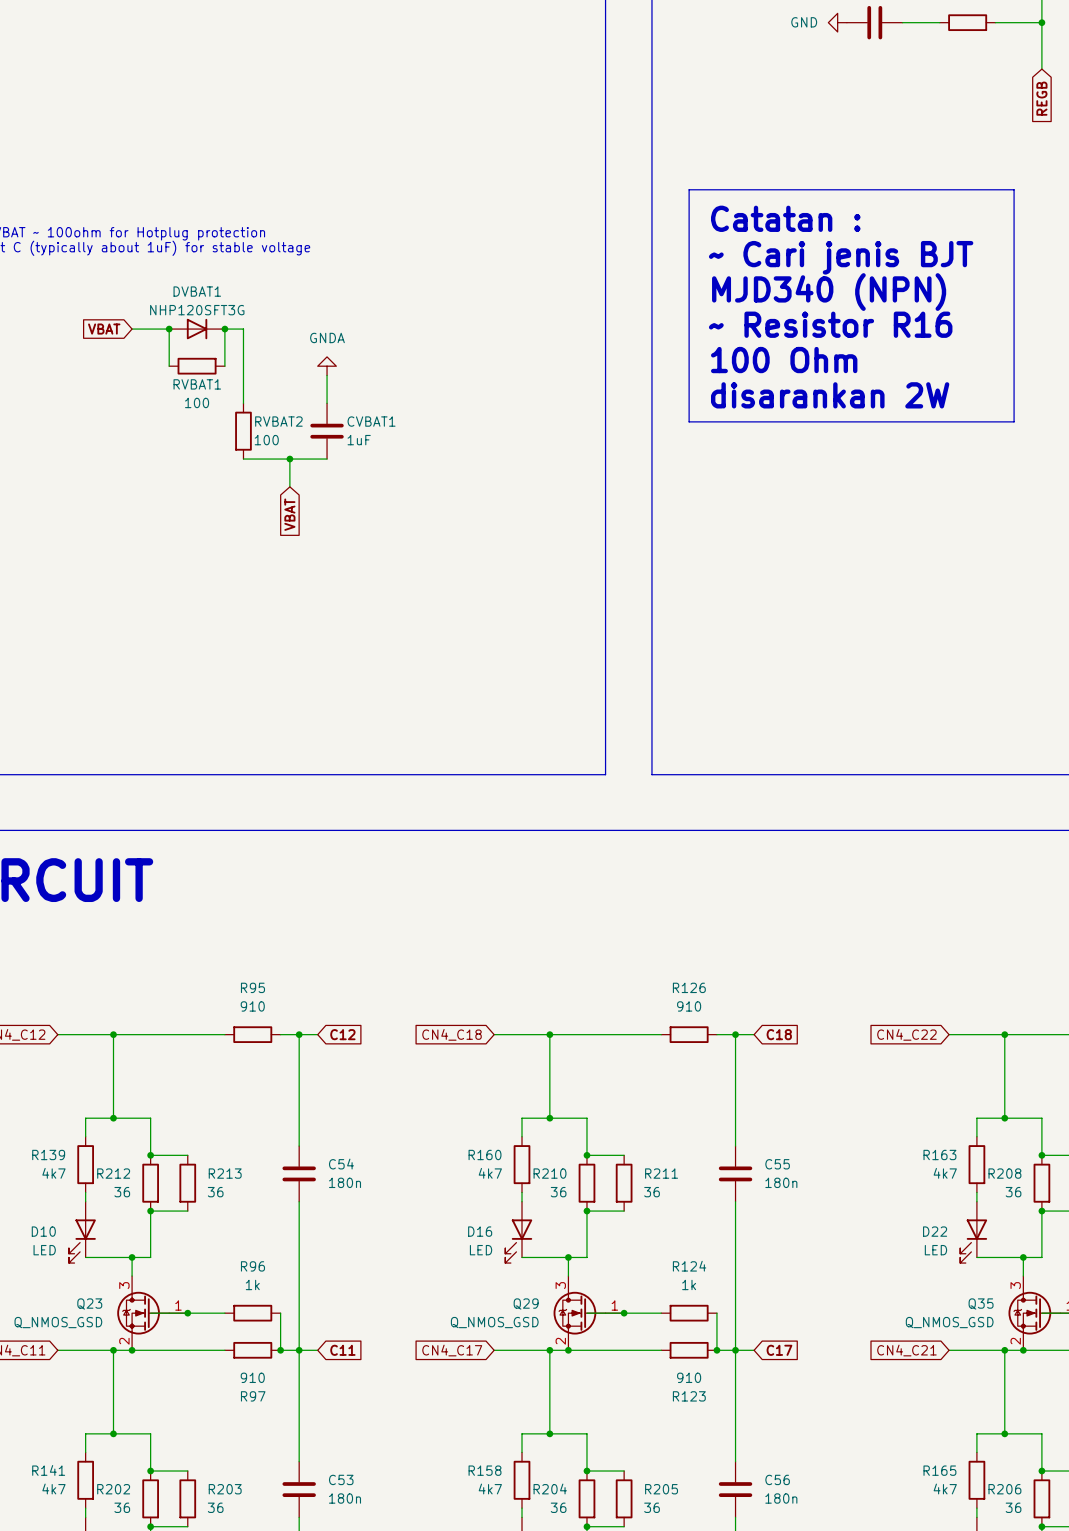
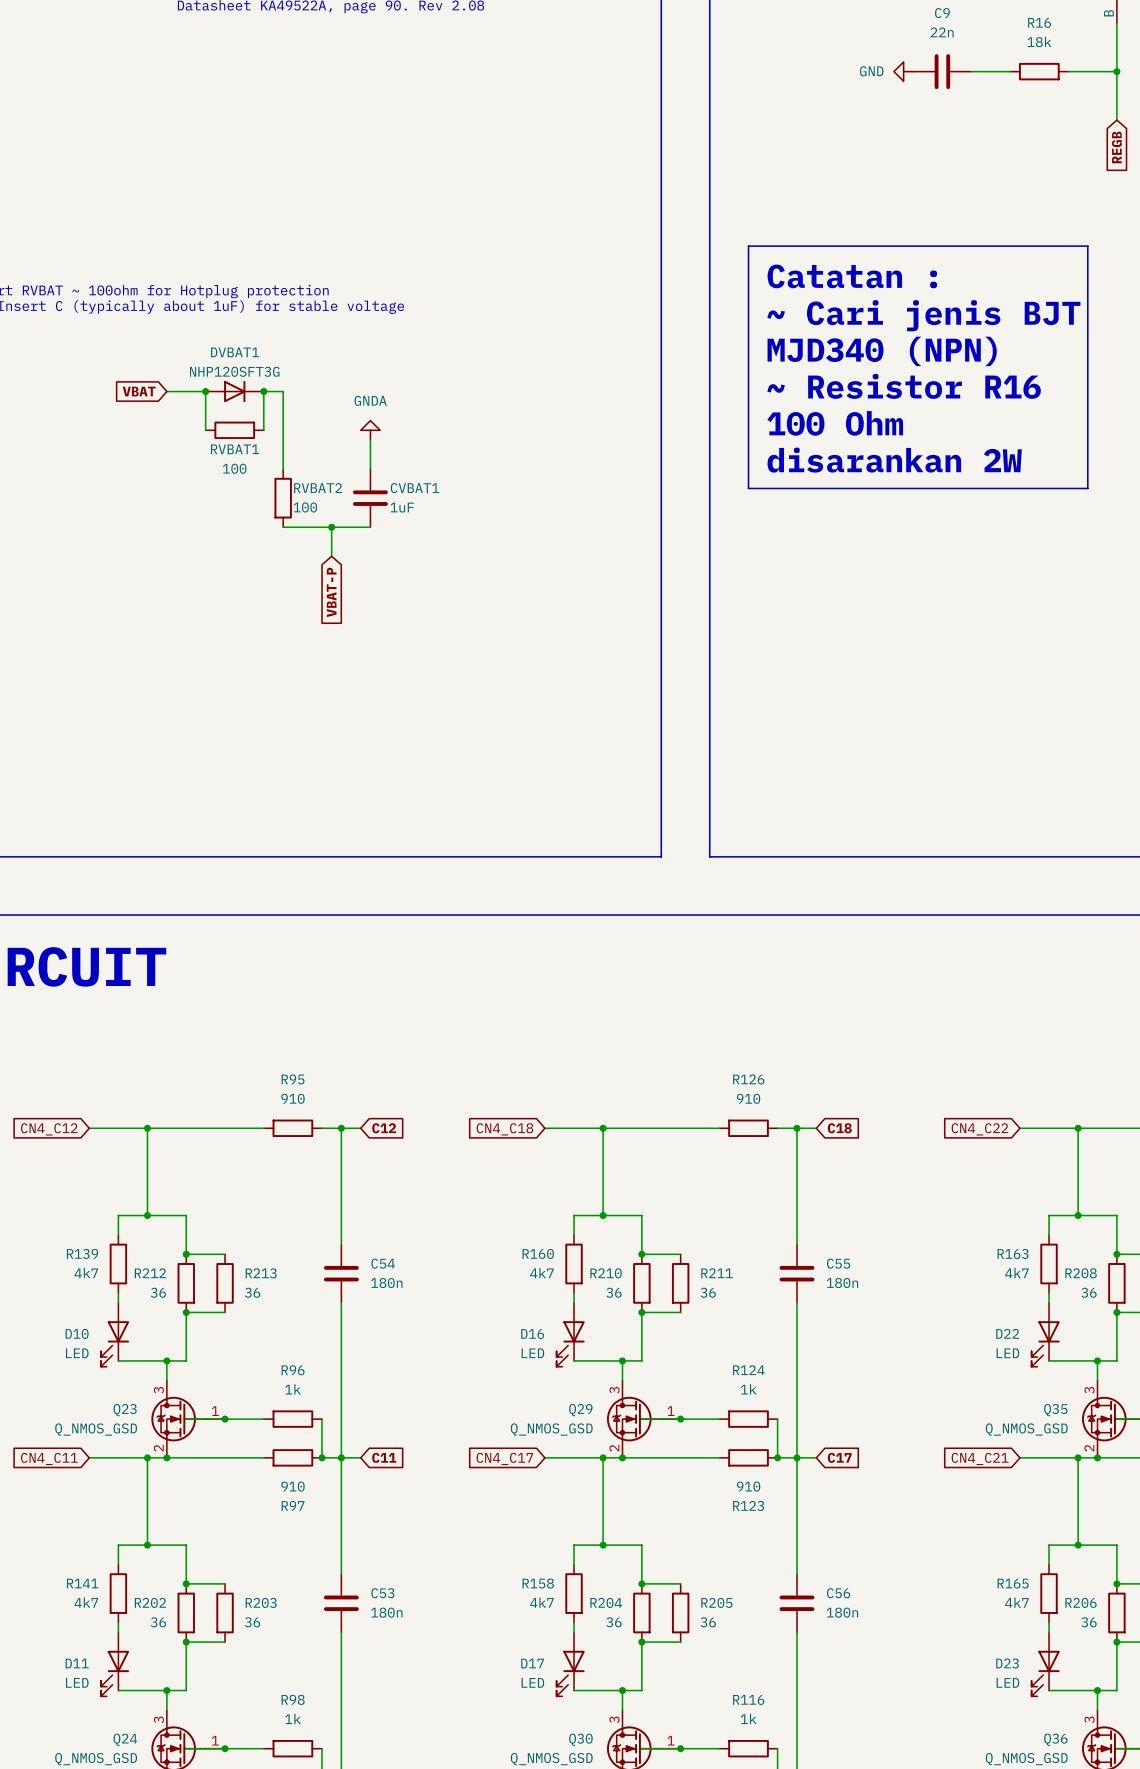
global label: VBAT (289, 514) -> VBAT-P (331, 592)

